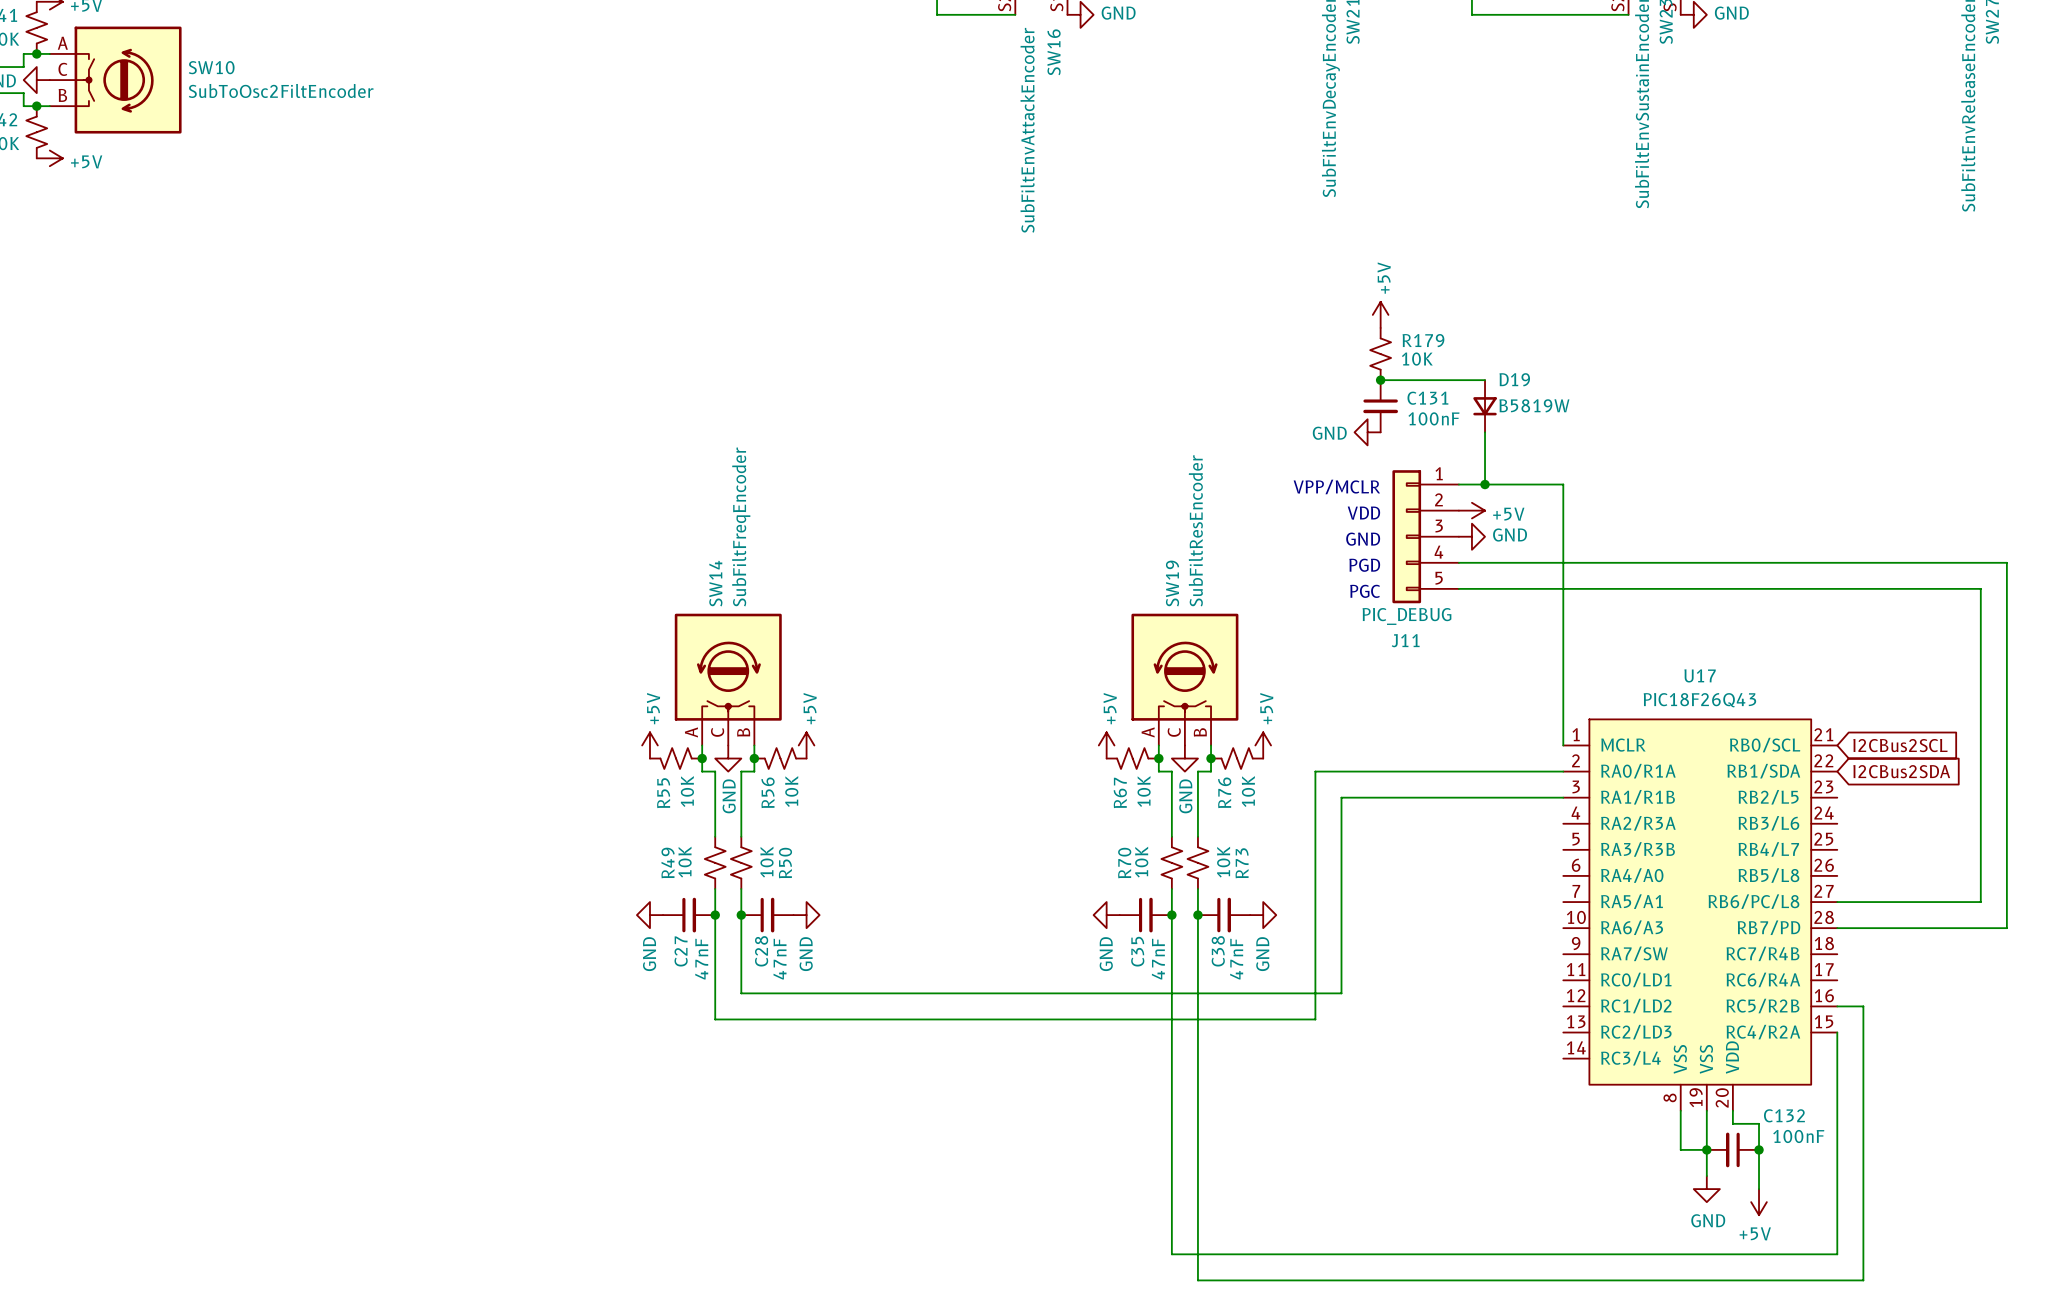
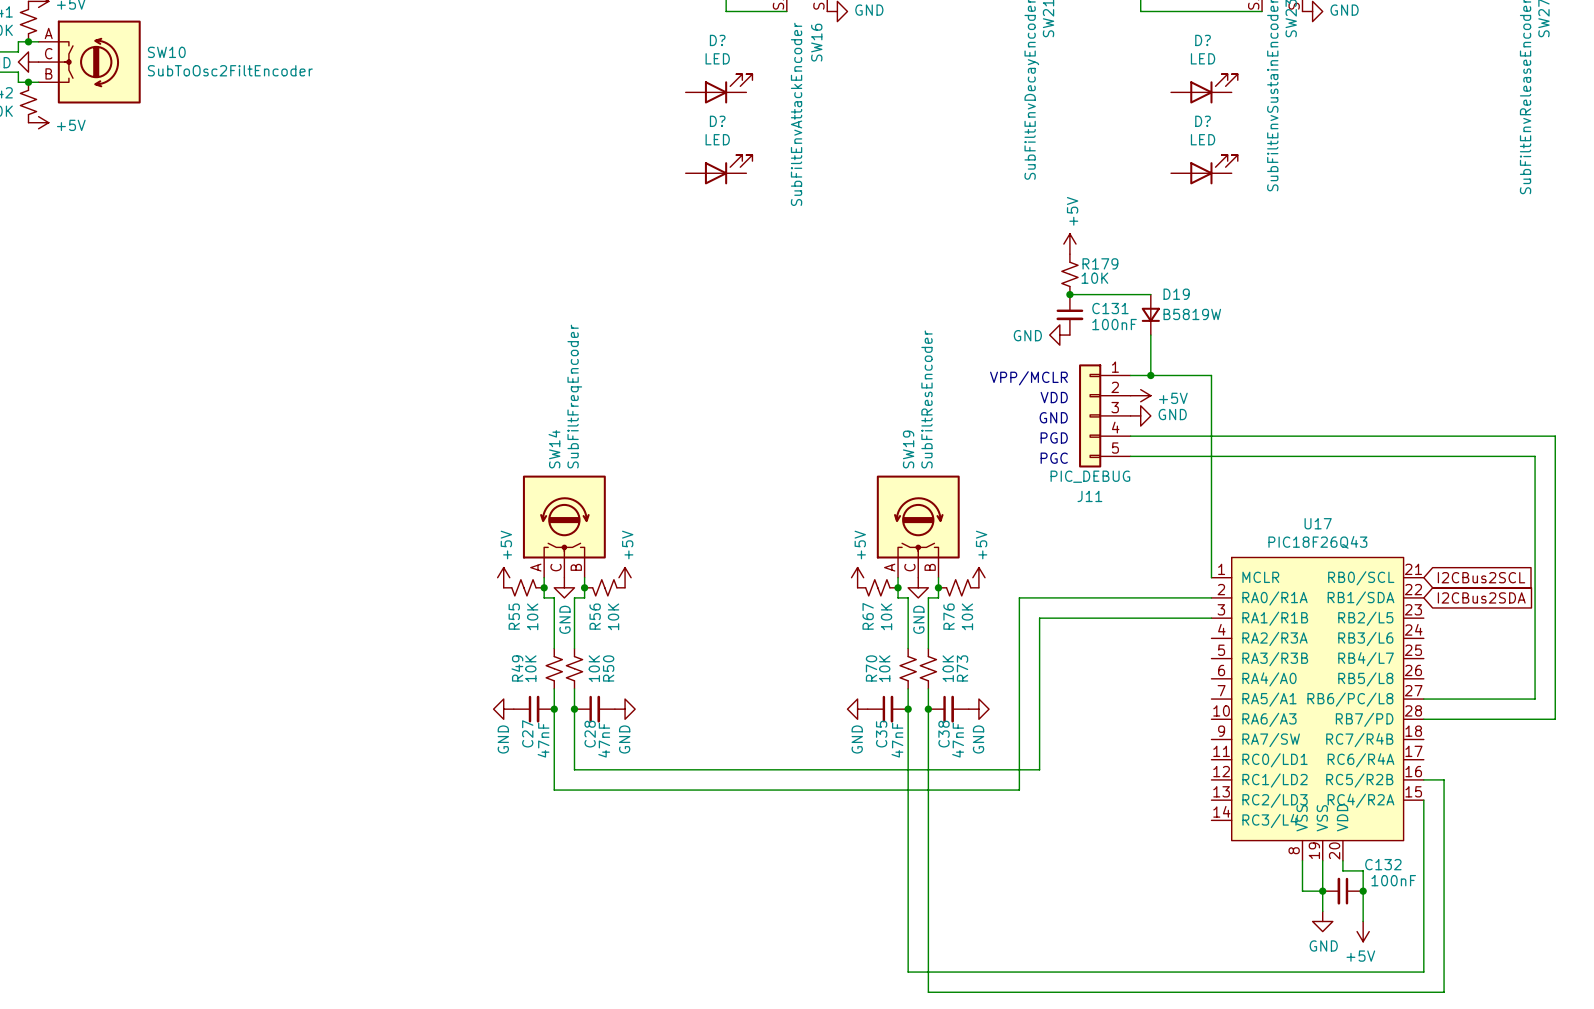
D?: none -> LED (719, 88)
D?: none -> LED (1204, 88)
D?: none -> LED (719, 169)
D?: none -> LED (1204, 169)

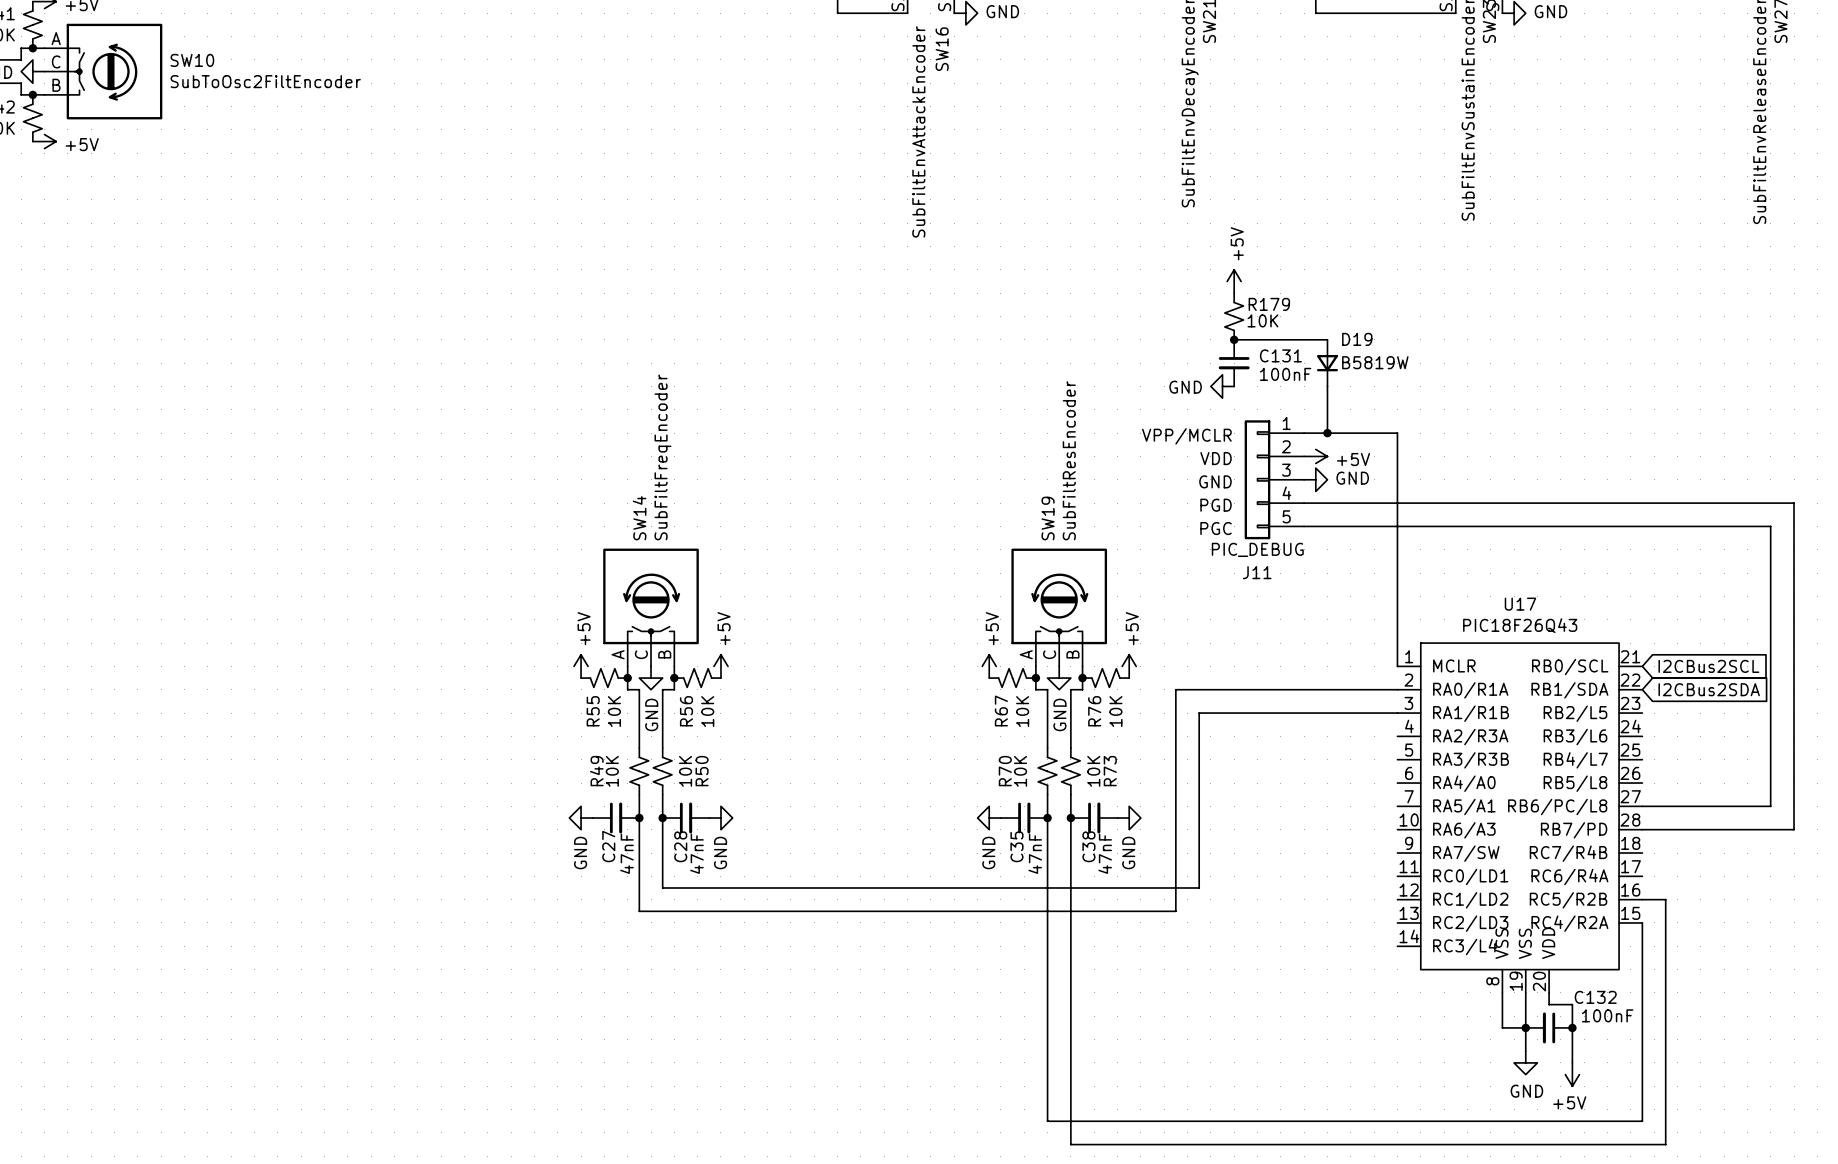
D?: LED (719, 88) -> none
D?: LED (1204, 88) -> none
D?: LED (719, 169) -> none
D?: LED (1204, 169) -> none

